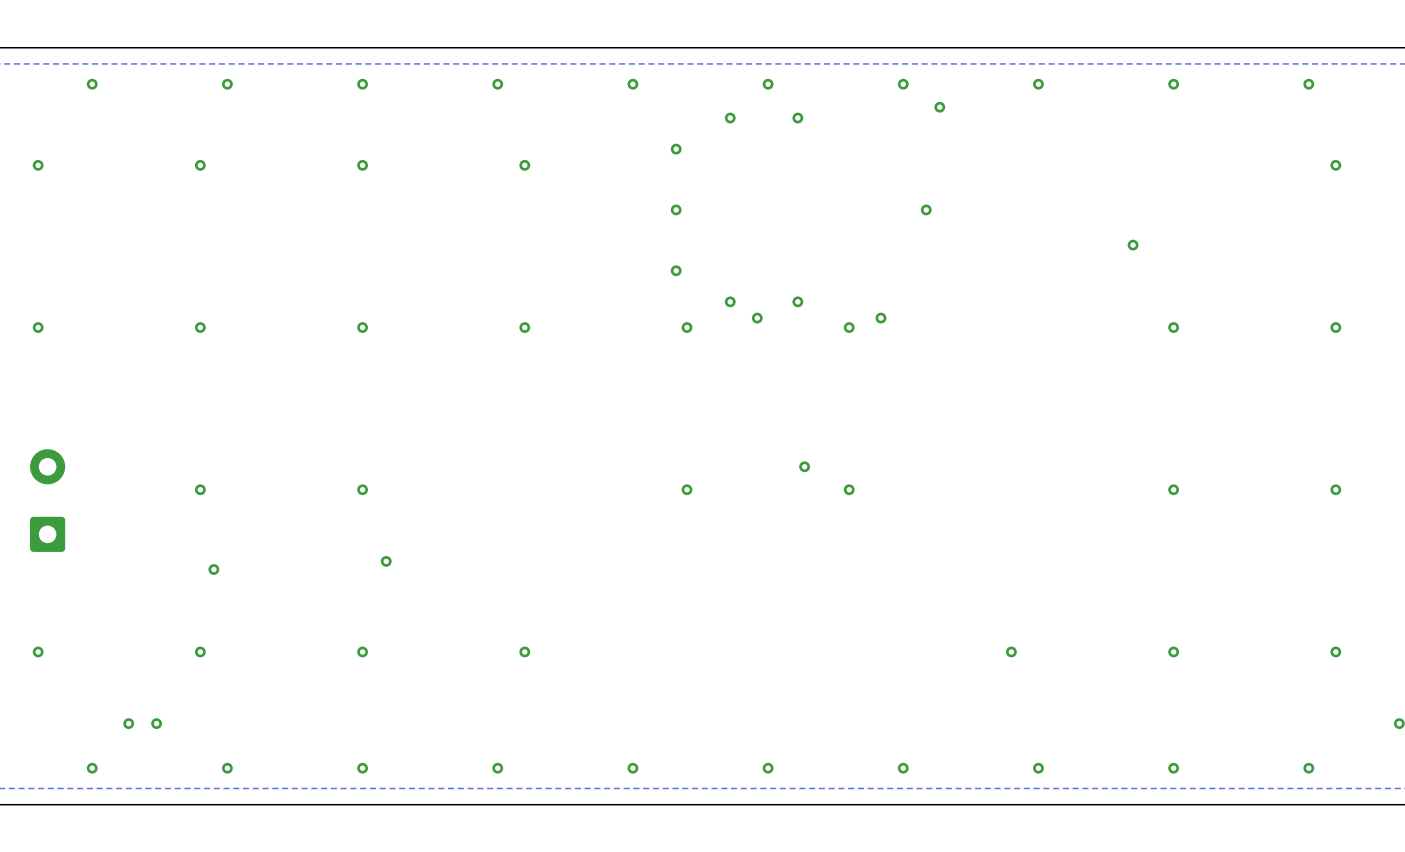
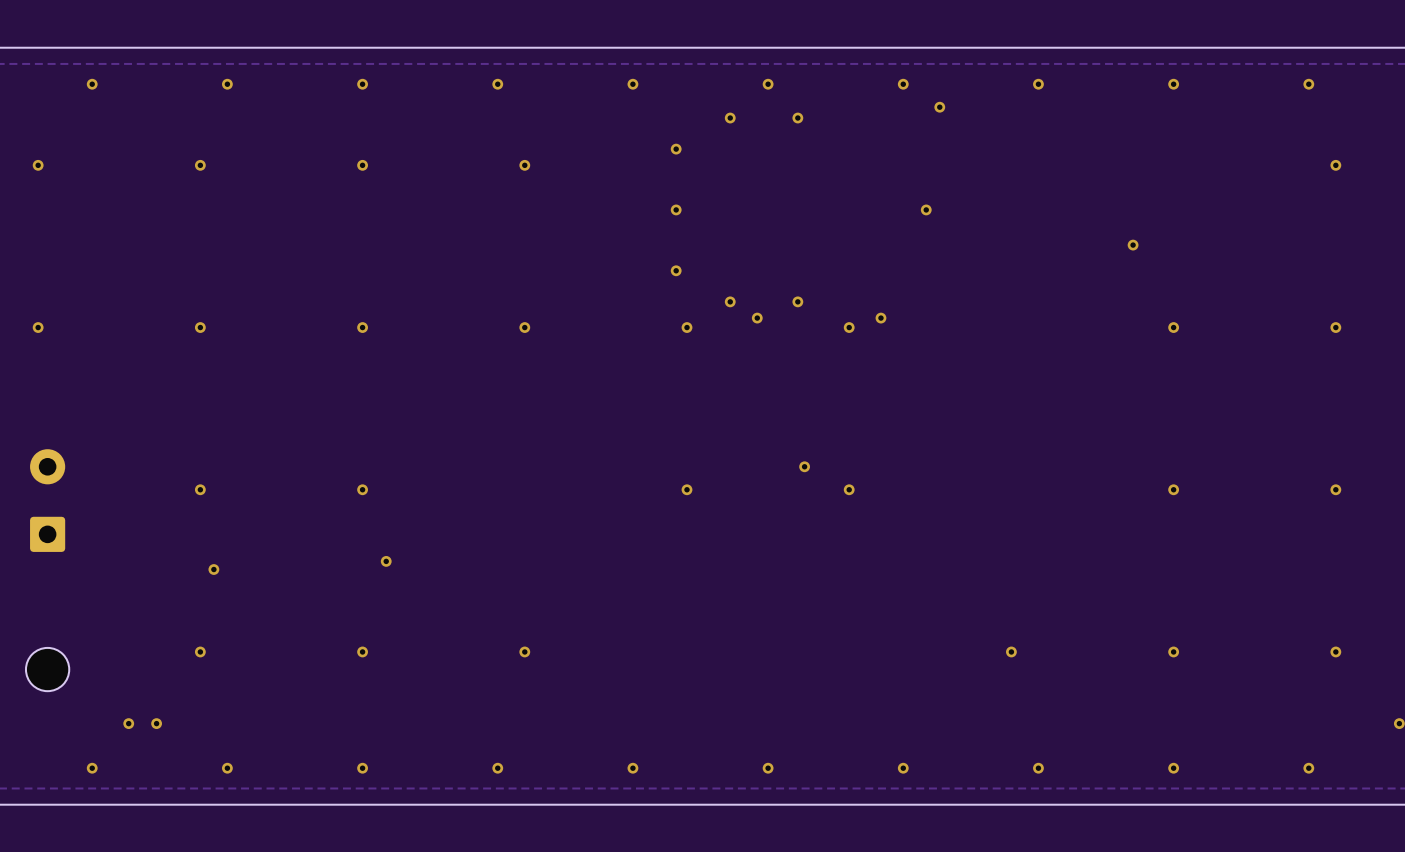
via: (38, 651) -> none
part: none -> (47, 669)

